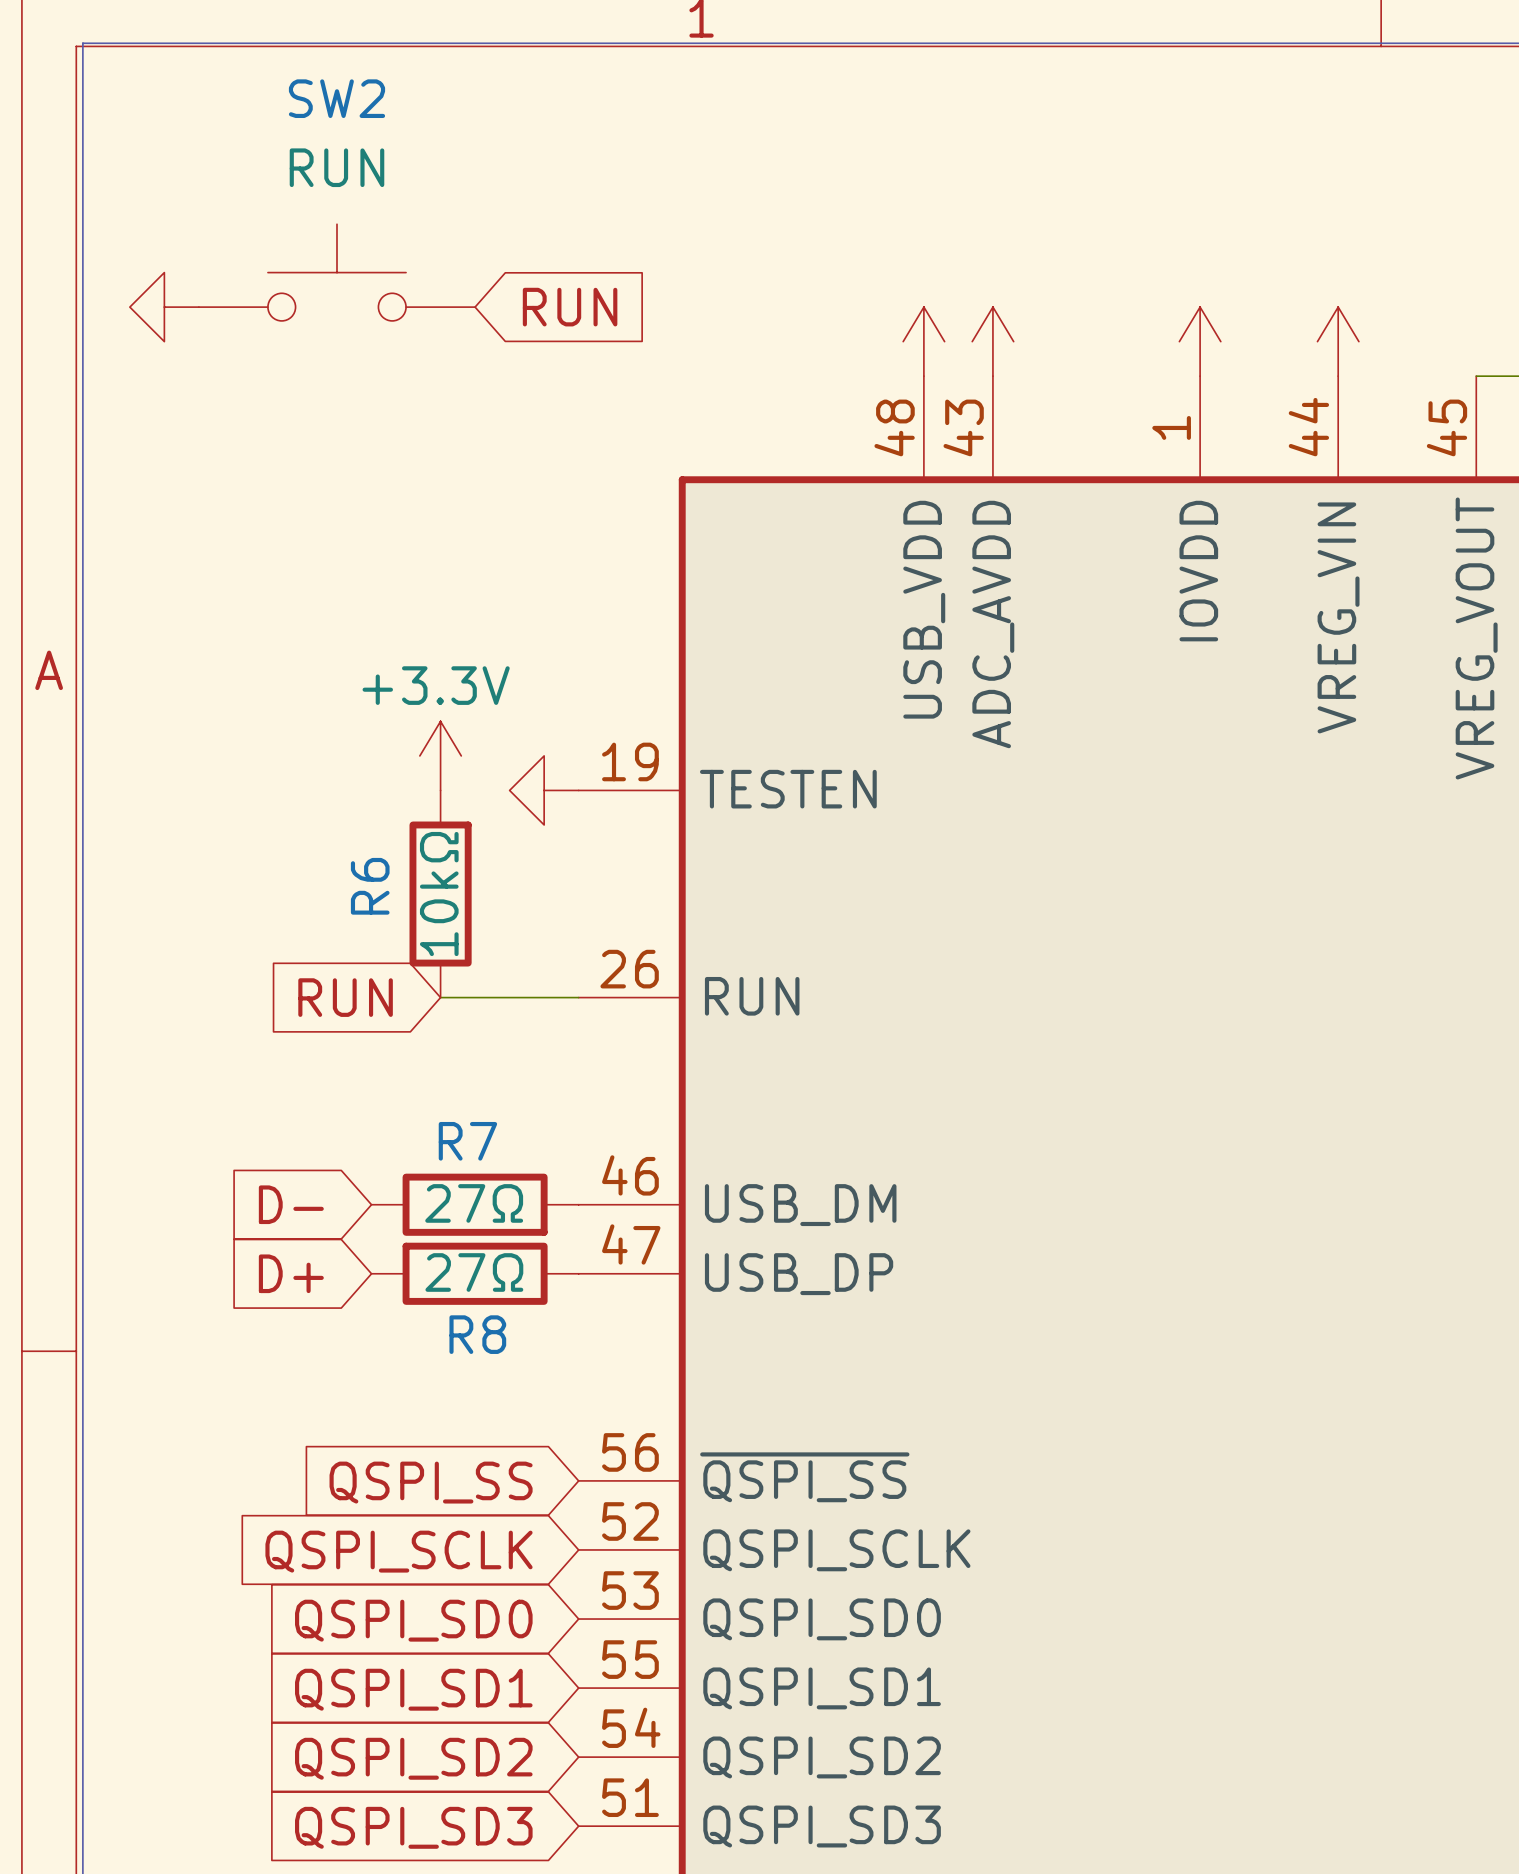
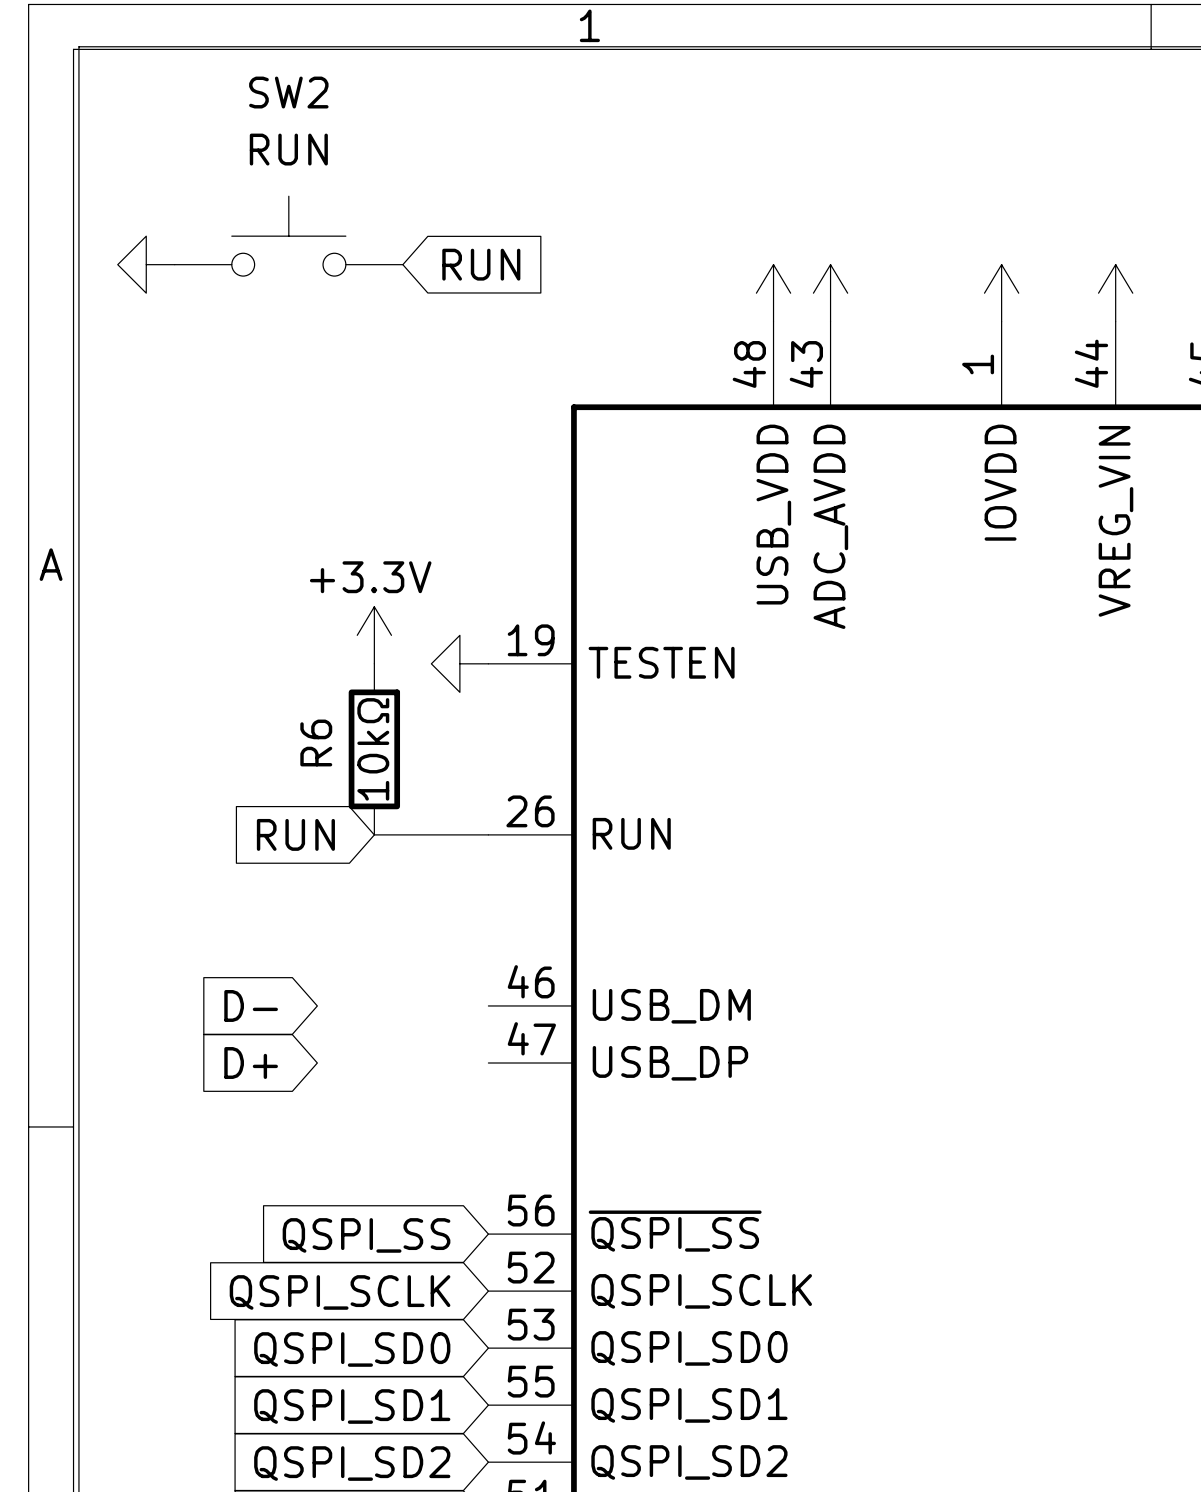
R7: 27Ω (475, 1204) -> none
R8: 27Ω (475, 1273) -> none

